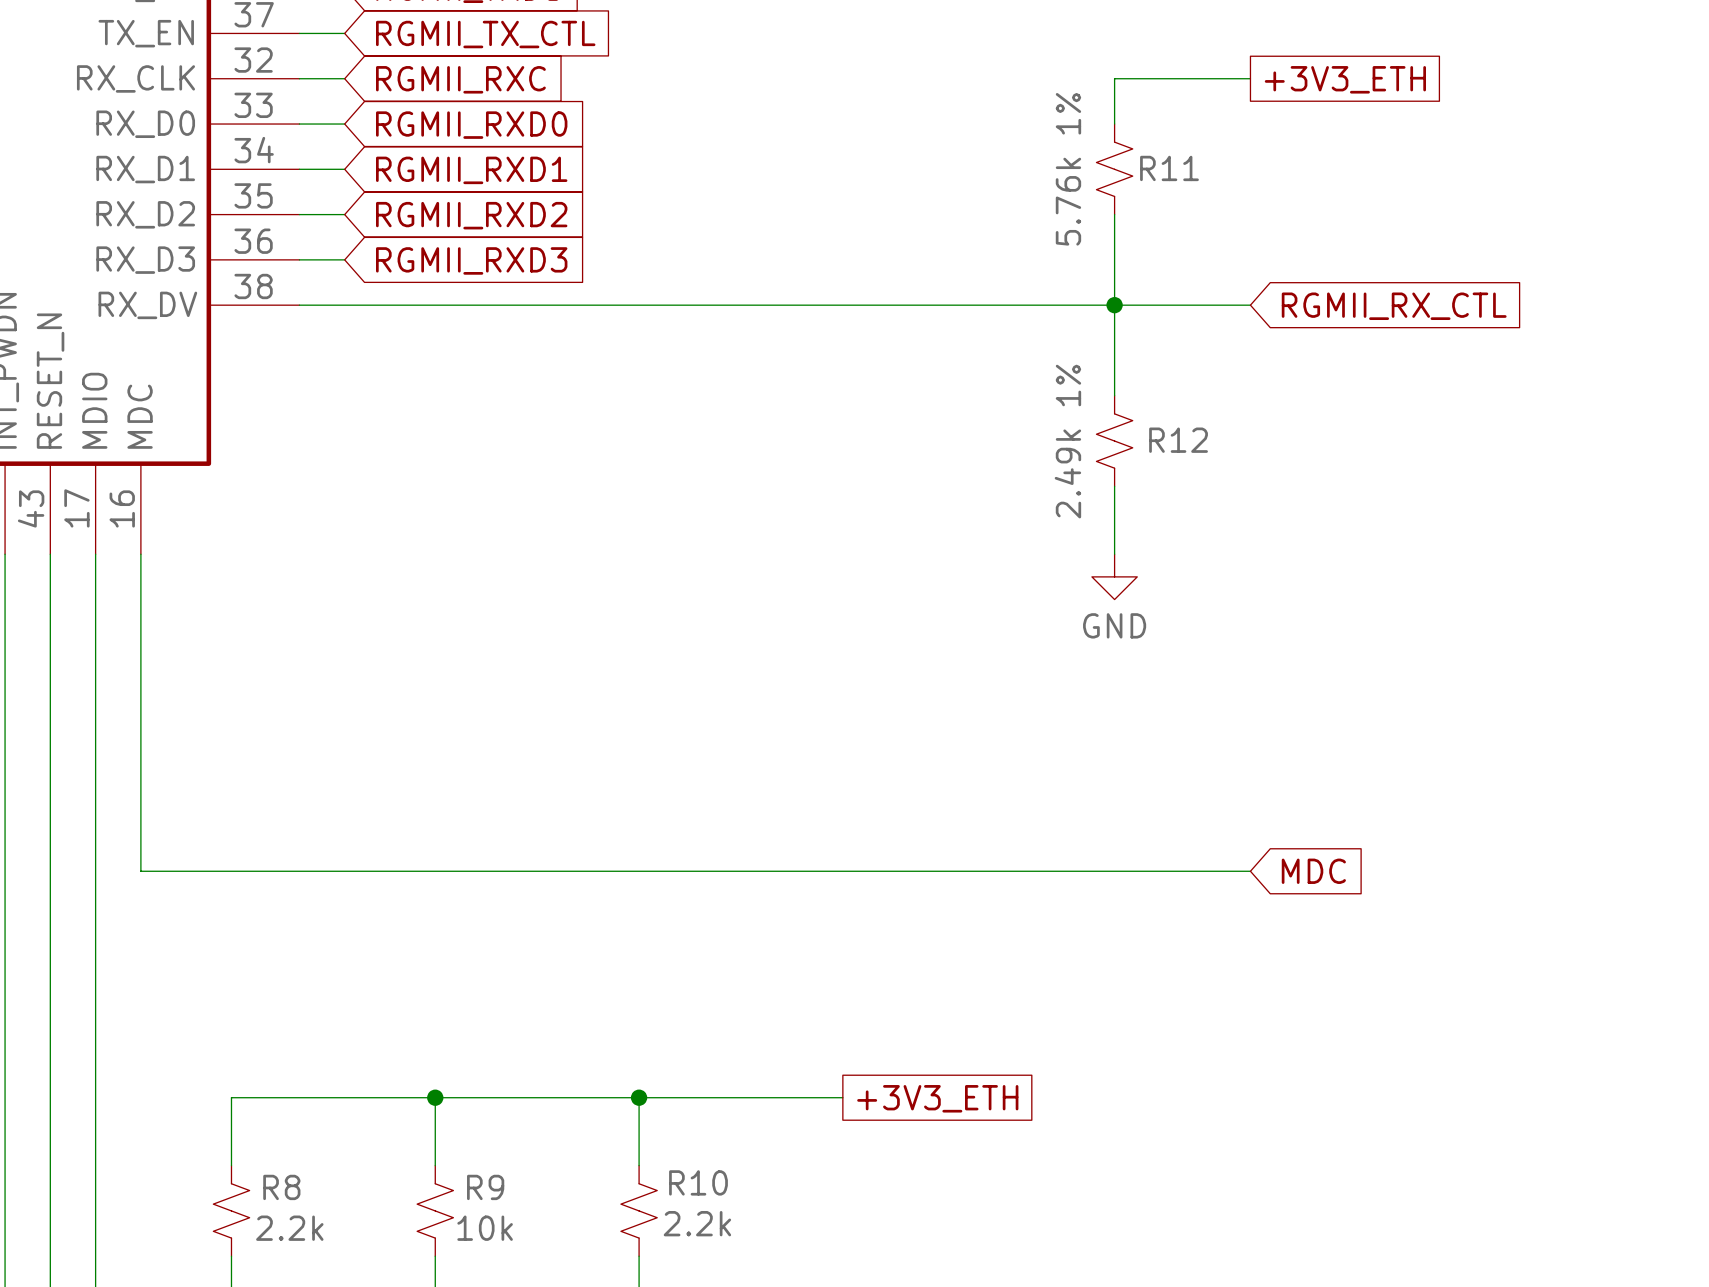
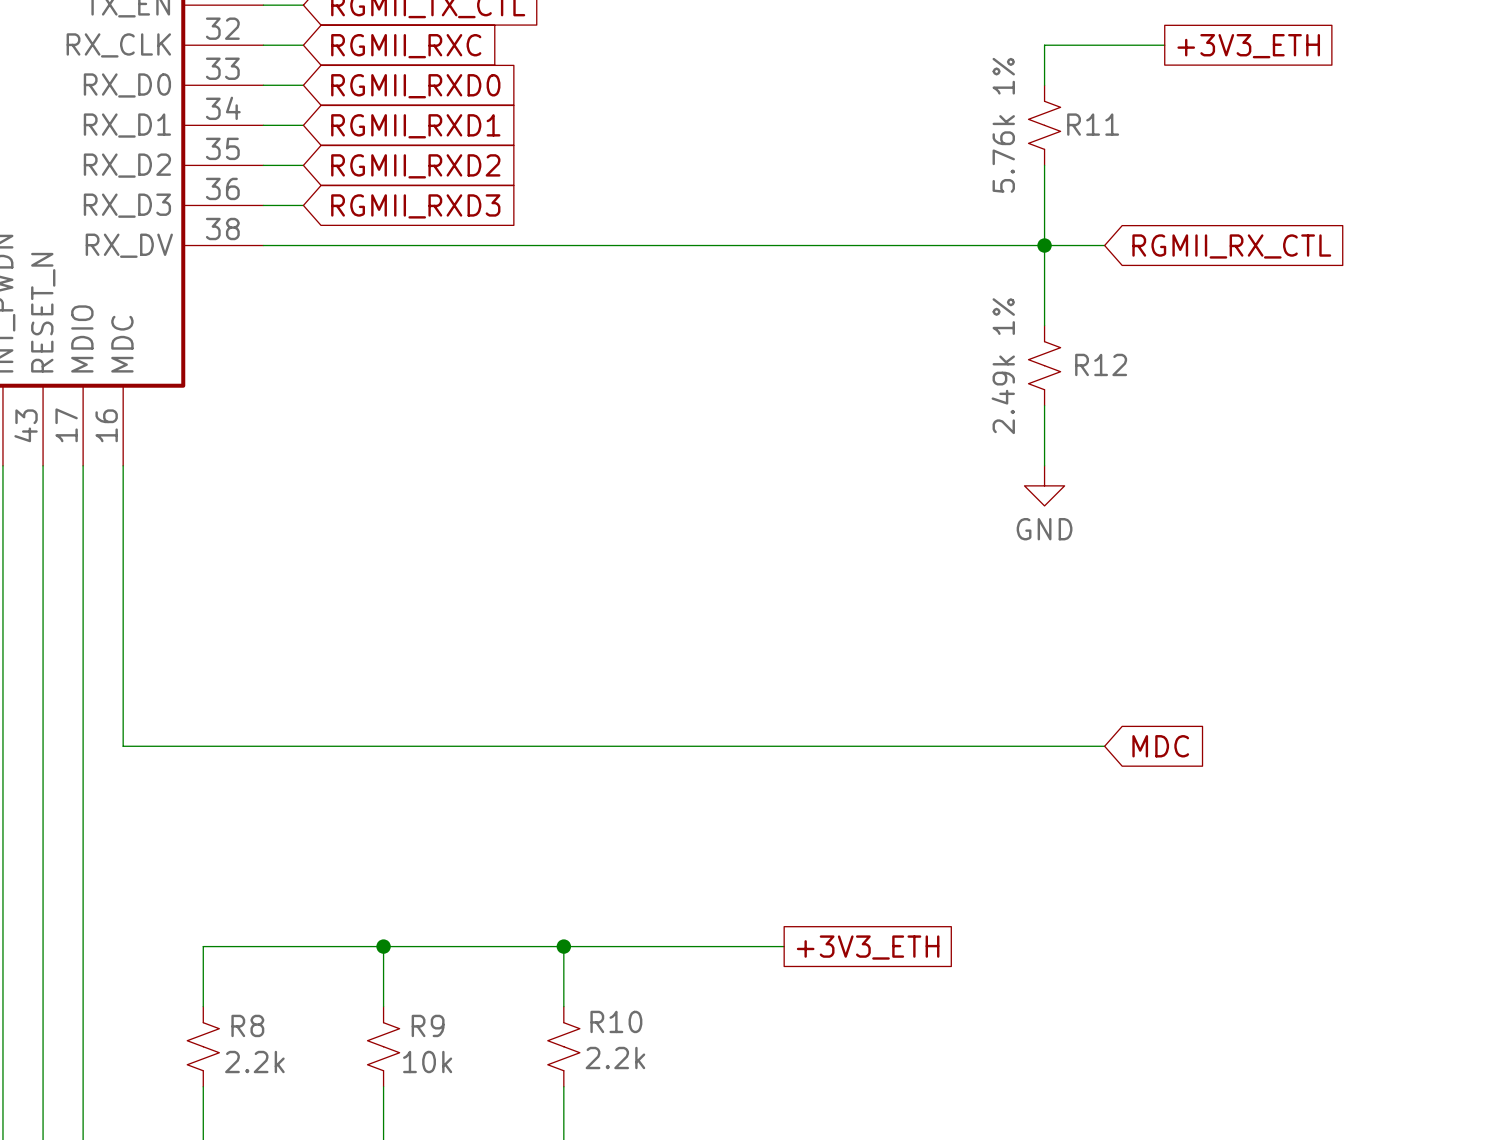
wire: (1182, 78) (1114, 78) (1114, 124) -> (1044, 45) (1044, 85)
wire: none -> (1104, 45) (1164, 45)
global label position: +3V3_ETH (1345, 79) -> +3V3_ETH (1248, 46)
R11 position: (1114, 169) -> (1044, 125)
wire: (1114, 214) (1114, 395) -> (1044, 165) (1044, 325)
junction position: (1114, 305) -> (1044, 245)
R12 position: (1114, 441) -> (1044, 365)
wire: (1114, 486) (1114, 554) -> (1044, 405) (1044, 465)
power symbol position: GND (1114, 576) -> GND (1044, 485)
wire: none -> (744, 946) (784, 946)
global label position: +3V3_ETH (937, 1098) -> +3V3_ETH (868, 947)

